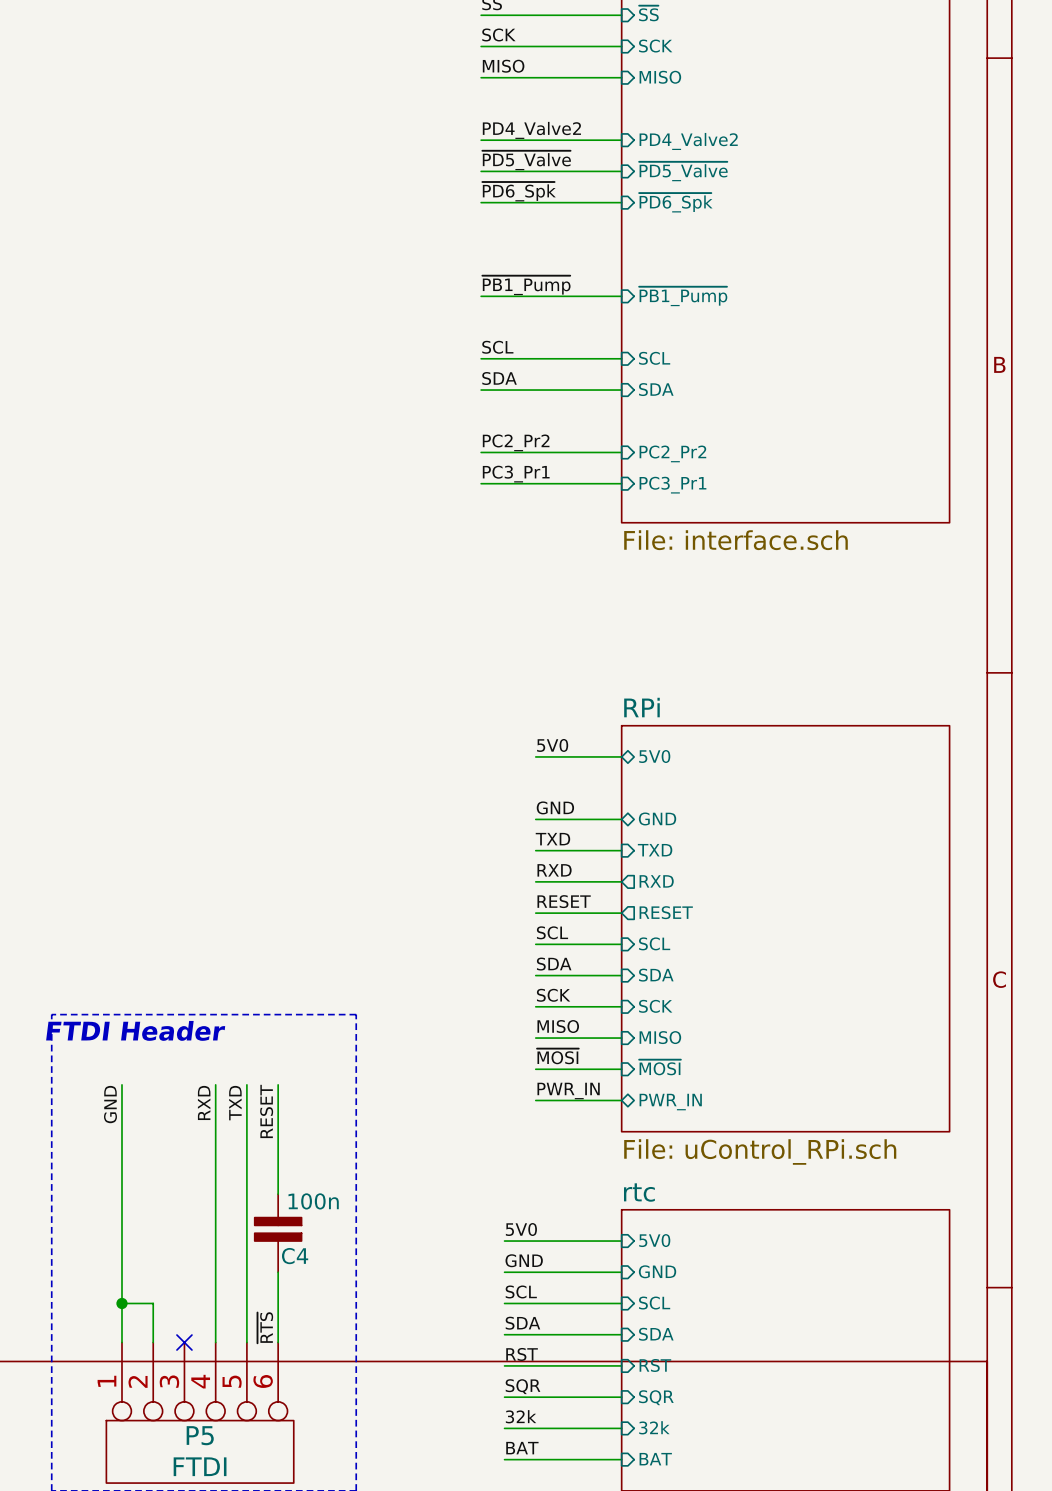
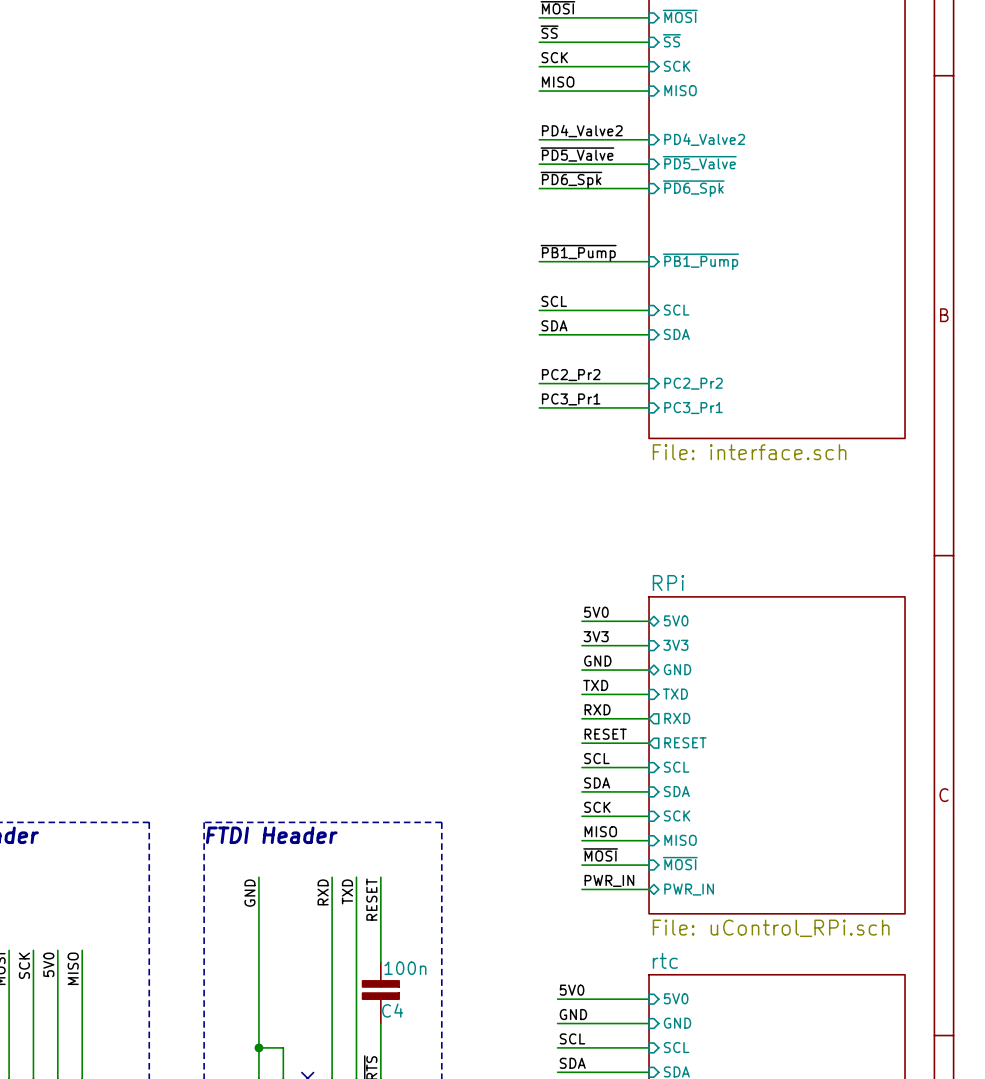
label: none -> 3V3 (596, 636)
sheet pin: none -> 3V3 (675, 645)
wire: none -> (581, 645) (649, 645)

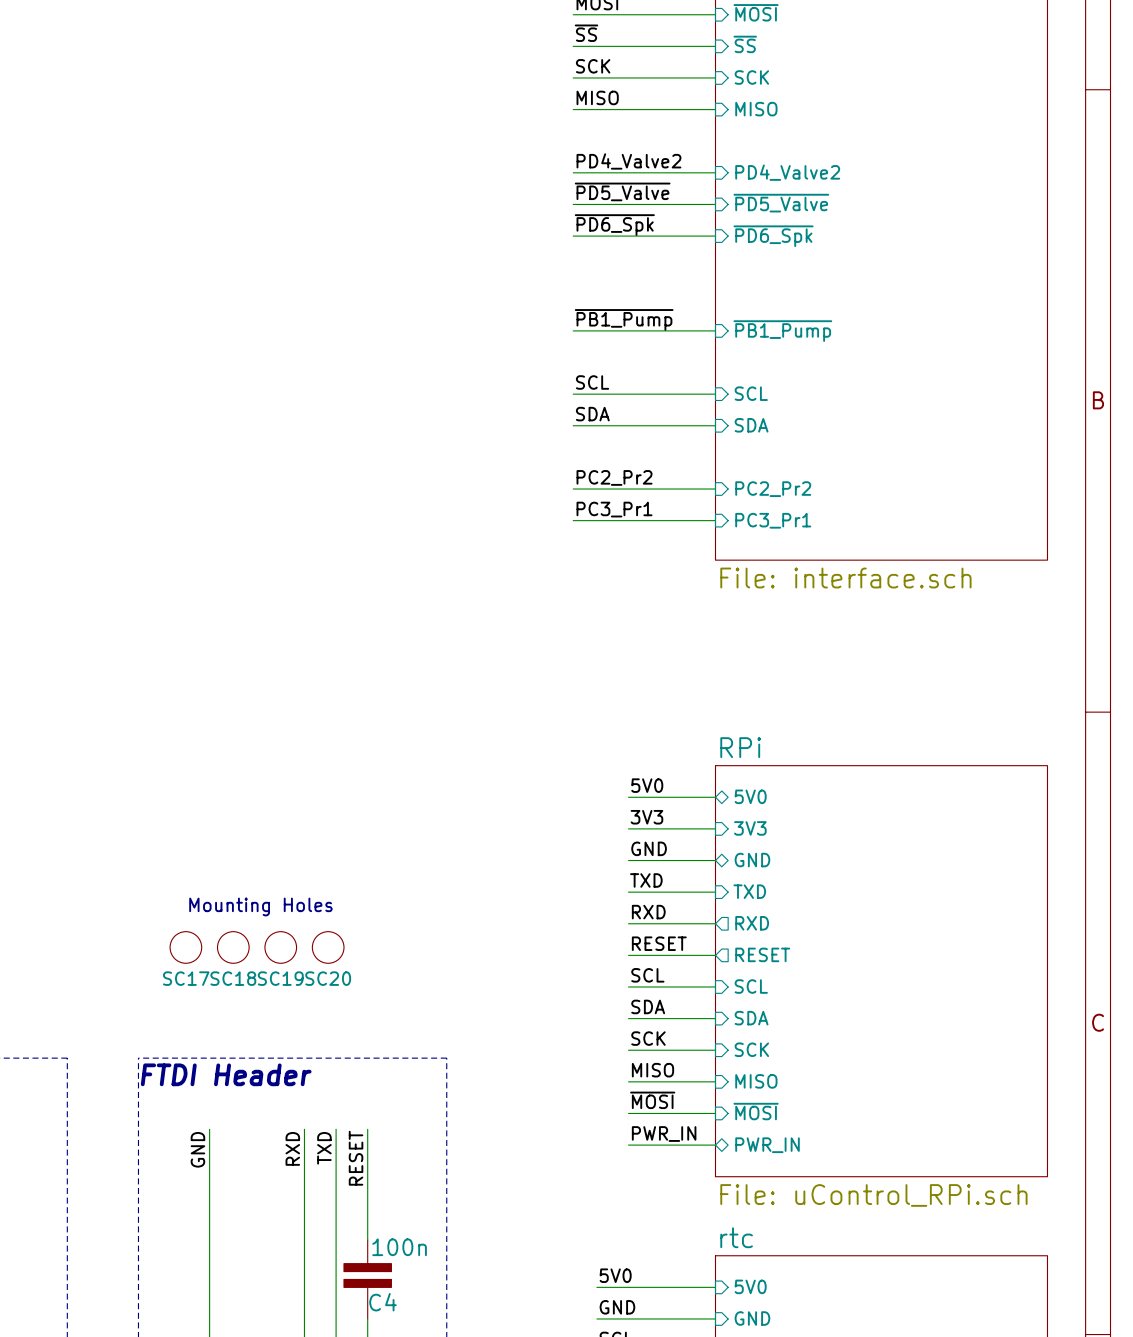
text: none -> Mounting Holes (260, 906)
SC17: none -> (185, 947)
SC18: none -> (233, 947)
SC19: none -> (280, 947)
SC20: none -> (328, 947)

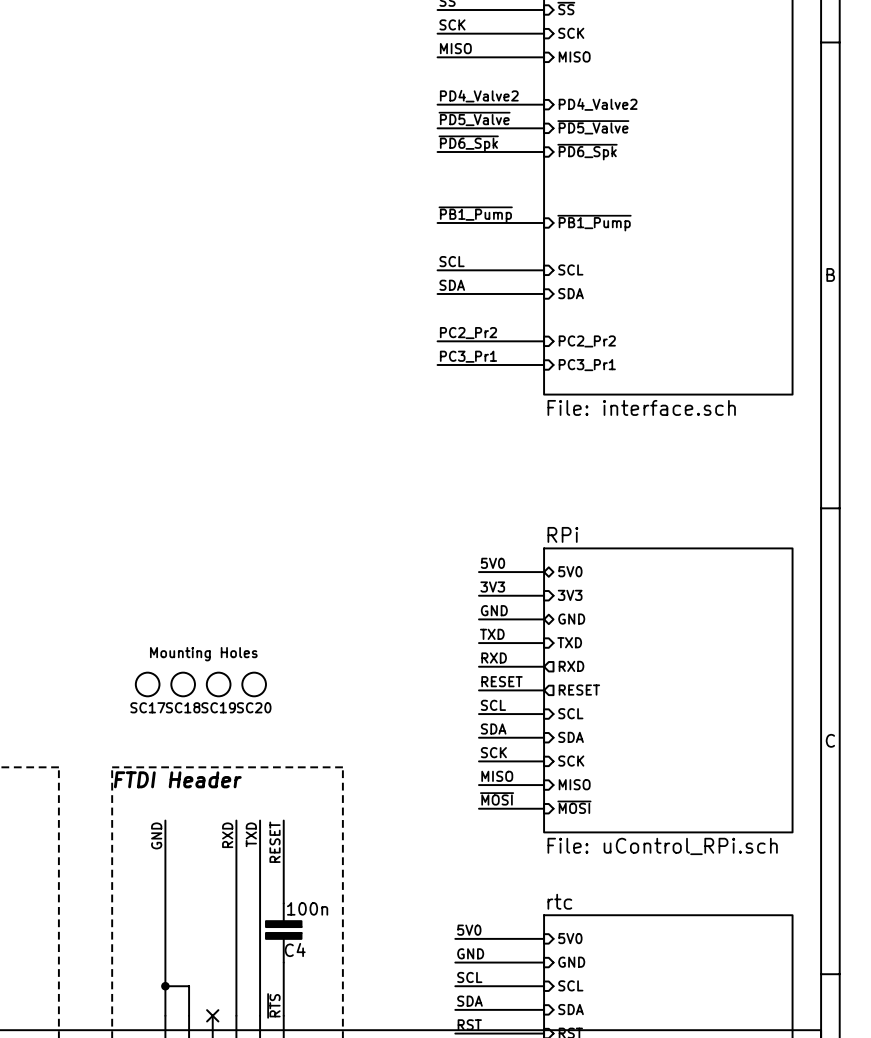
sheet RPi: none -> File: uControl_RPi.sch (668, 690)
sheet RPi: File: uControl_RPi.sch (881, 971) -> none
label: PWR_IN (664, 1134) -> none
wire: (628, 1145) (715, 1145) -> none
sheet pin: PWR_IN (767, 1145) -> none

